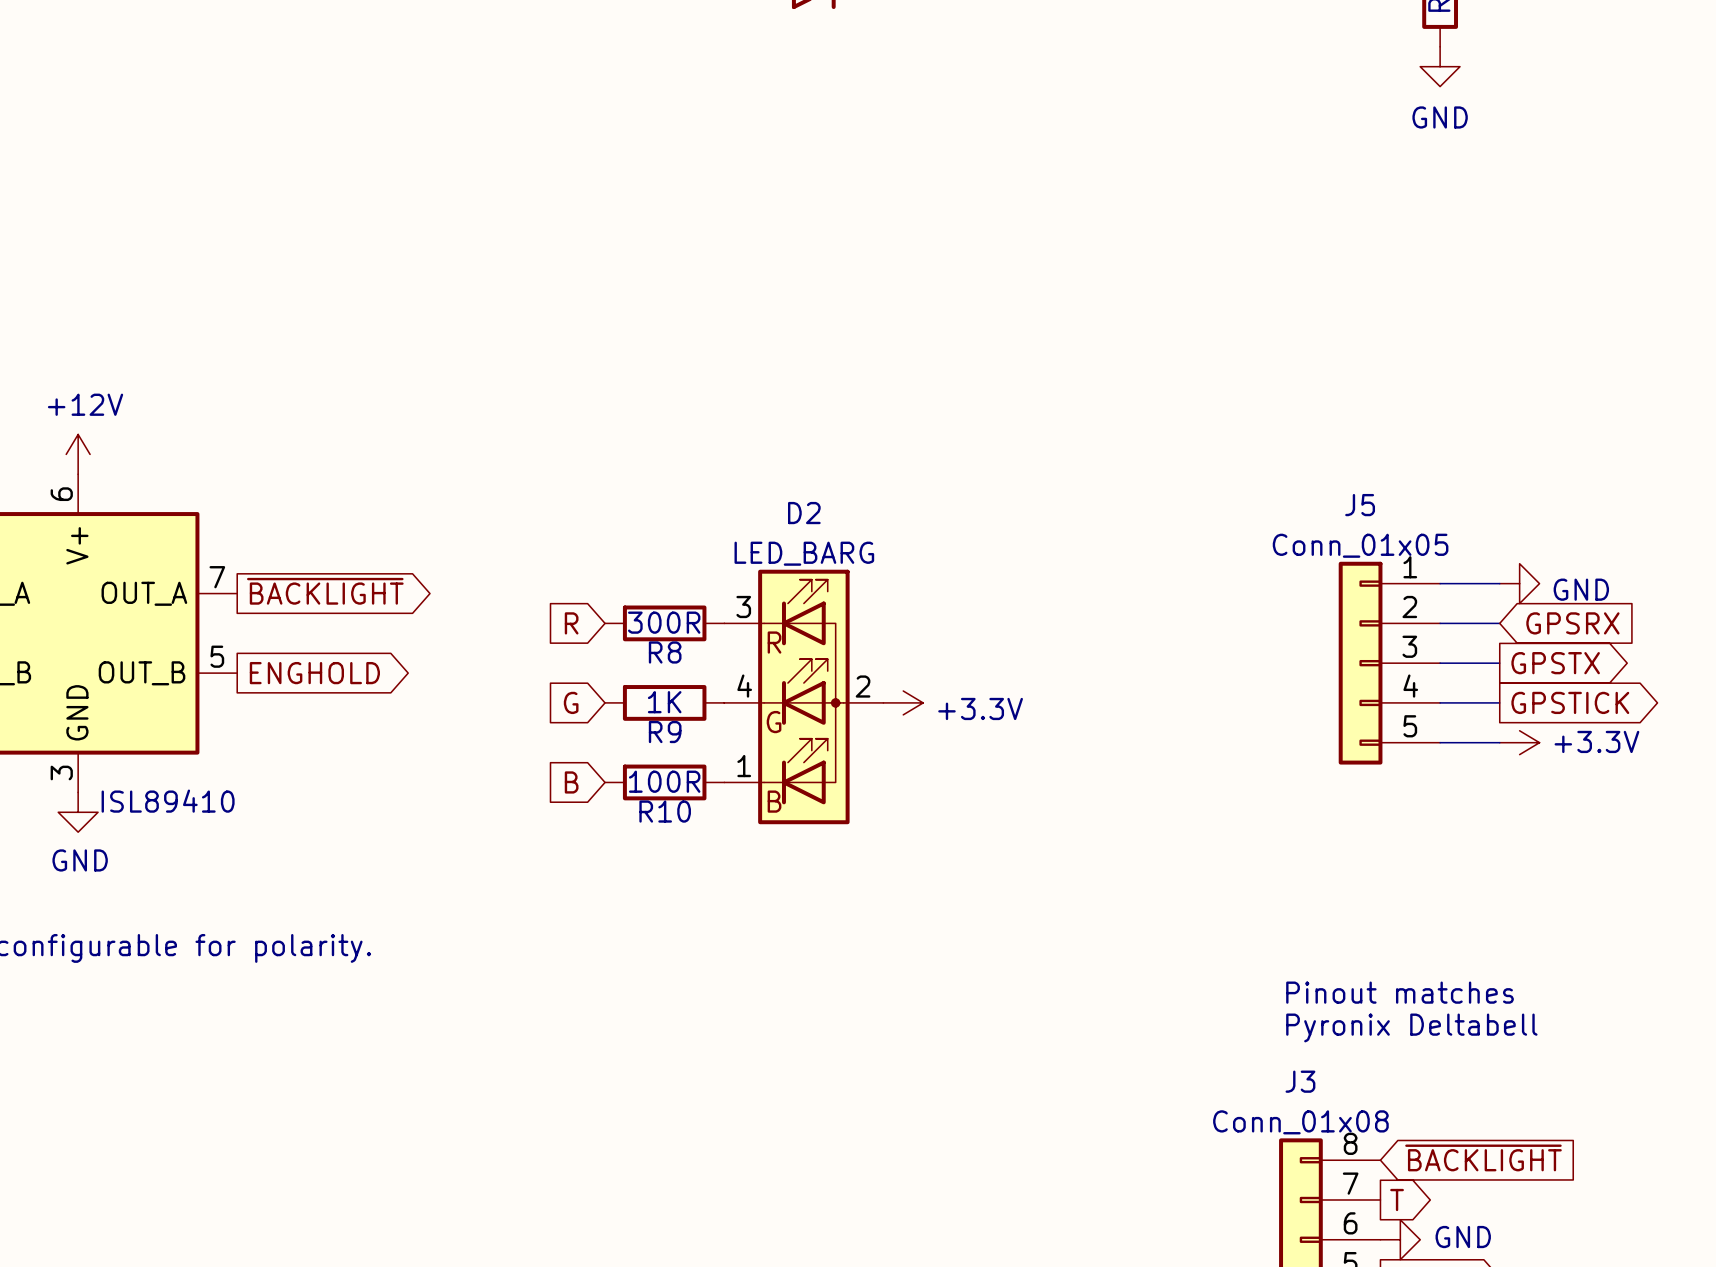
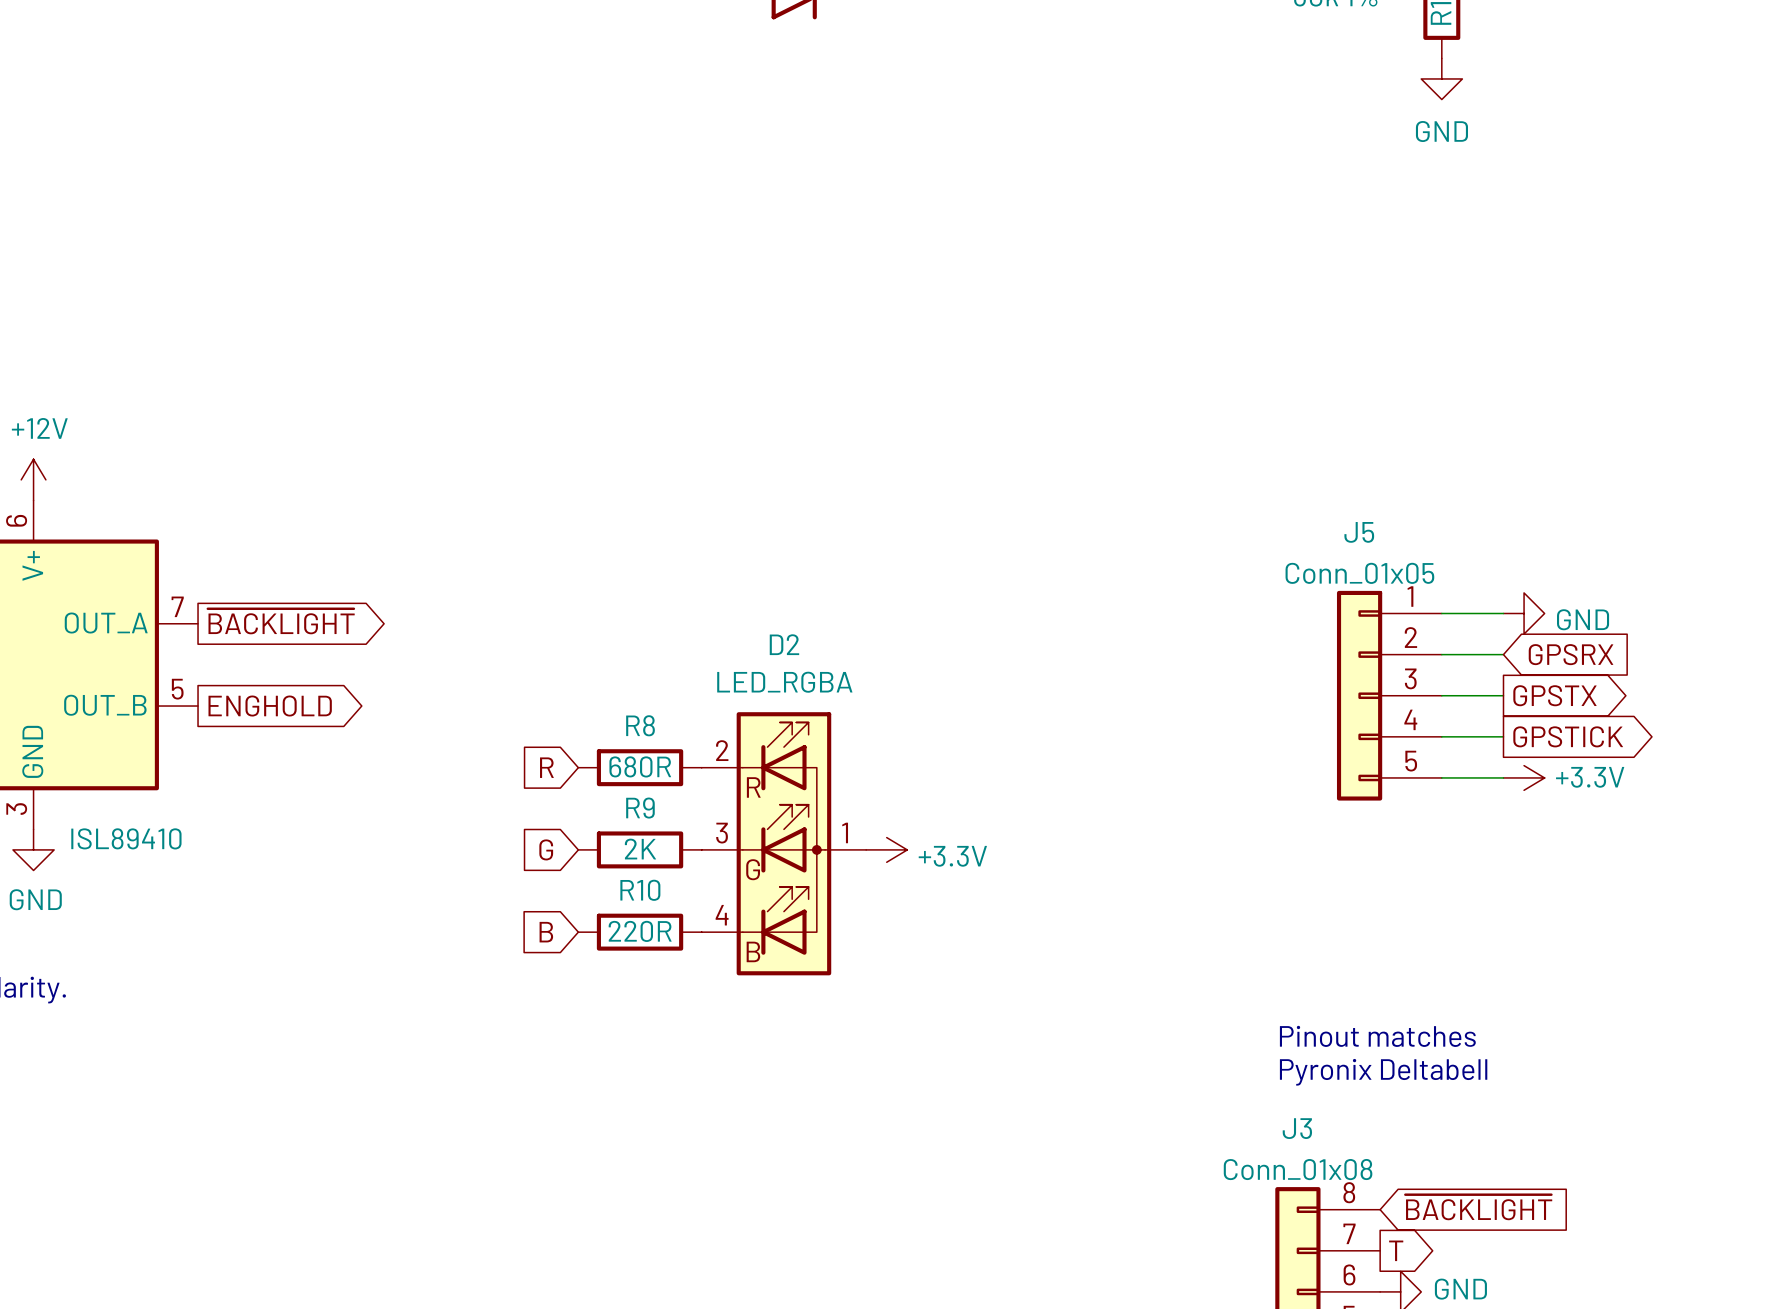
D2 name position: D2 (804, 513) -> D2 (784, 644)
D2 value: LED_BARG (804, 553) -> LED_RGBA (784, 682)
D2 pin number: 3 (743, 607) -> 2 (722, 750)
R8 value: 300R (664, 622) -> 680R (640, 766)
global label position: R (571, 623) -> R (546, 767)
R8 position: (664, 623) -> (640, 767)
R8 name position: R8 (665, 652) -> R8 (640, 725)
D2 pin number: 4 (744, 686) -> 3 (722, 833)
D2 pin number: 2 (863, 686) -> 1 (845, 832)
D2 position: (803, 696) -> (783, 843)
global label position: G (571, 702) -> G (546, 849)
R9 position: (664, 702) -> (640, 849)
R9 value: 1K (664, 702) -> 2K (640, 849)
power symbol position: +3.3V (903, 702) -> +3.3V (886, 849)
R9 name position: R9 (665, 732) -> R9 (640, 808)
D2 pin number: 1 (744, 766) -> 4 (722, 915)
R10 value: 100R (664, 781) -> 220R (640, 931)
global label position: B (571, 782) -> B (546, 932)
R10 position: (664, 782) -> (640, 932)
R10 name position: R10 (665, 811) -> R10 (640, 890)

